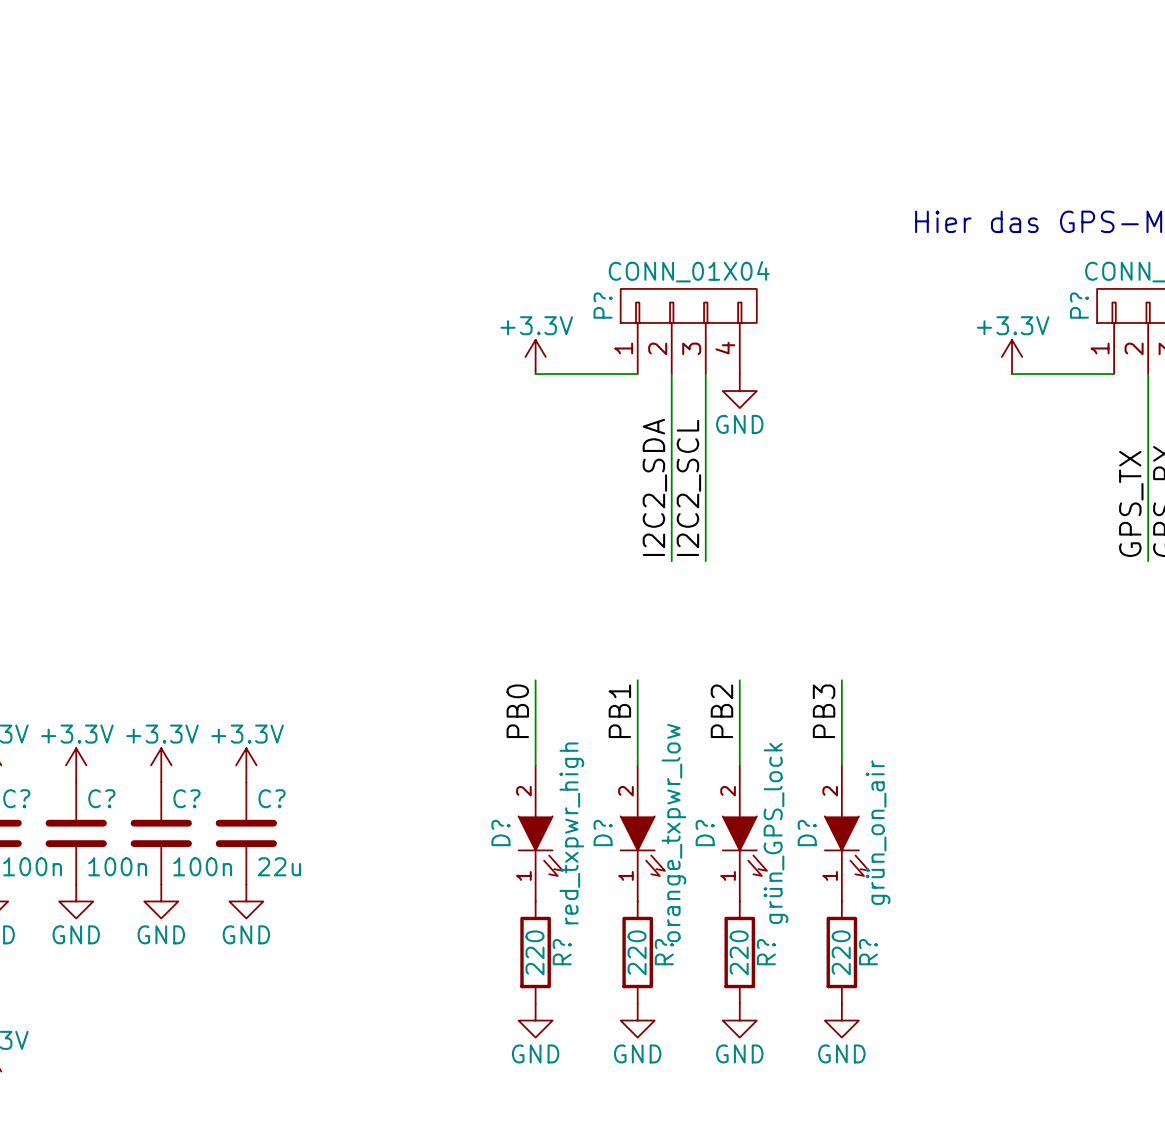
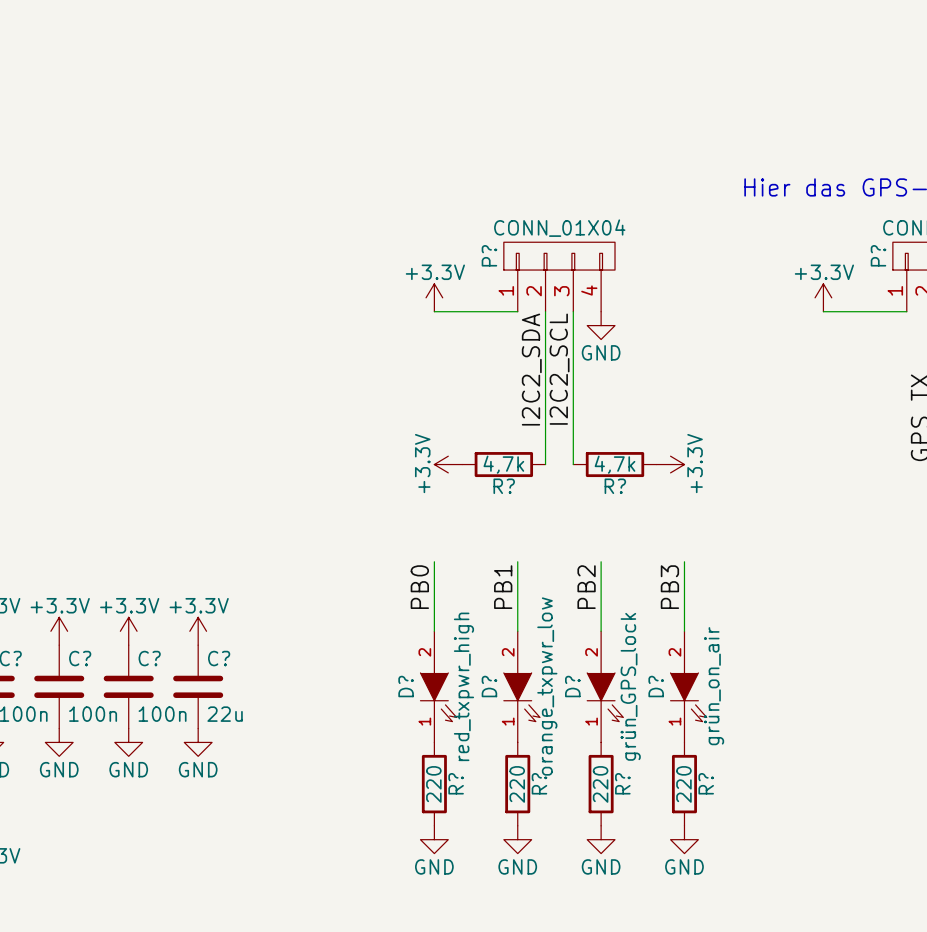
label position: I2C2_SDA (654, 487) -> I2C2_SDA (531, 369)
label position: I2C2_SCL (688, 487) -> I2C2_SCL (559, 369)
power symbol: none -> +3.3V (448, 464)
R?: none -> 4,7k (503, 464)
R?: none -> 4,7k (615, 464)
power symbol: none -> +3.3V (670, 464)

